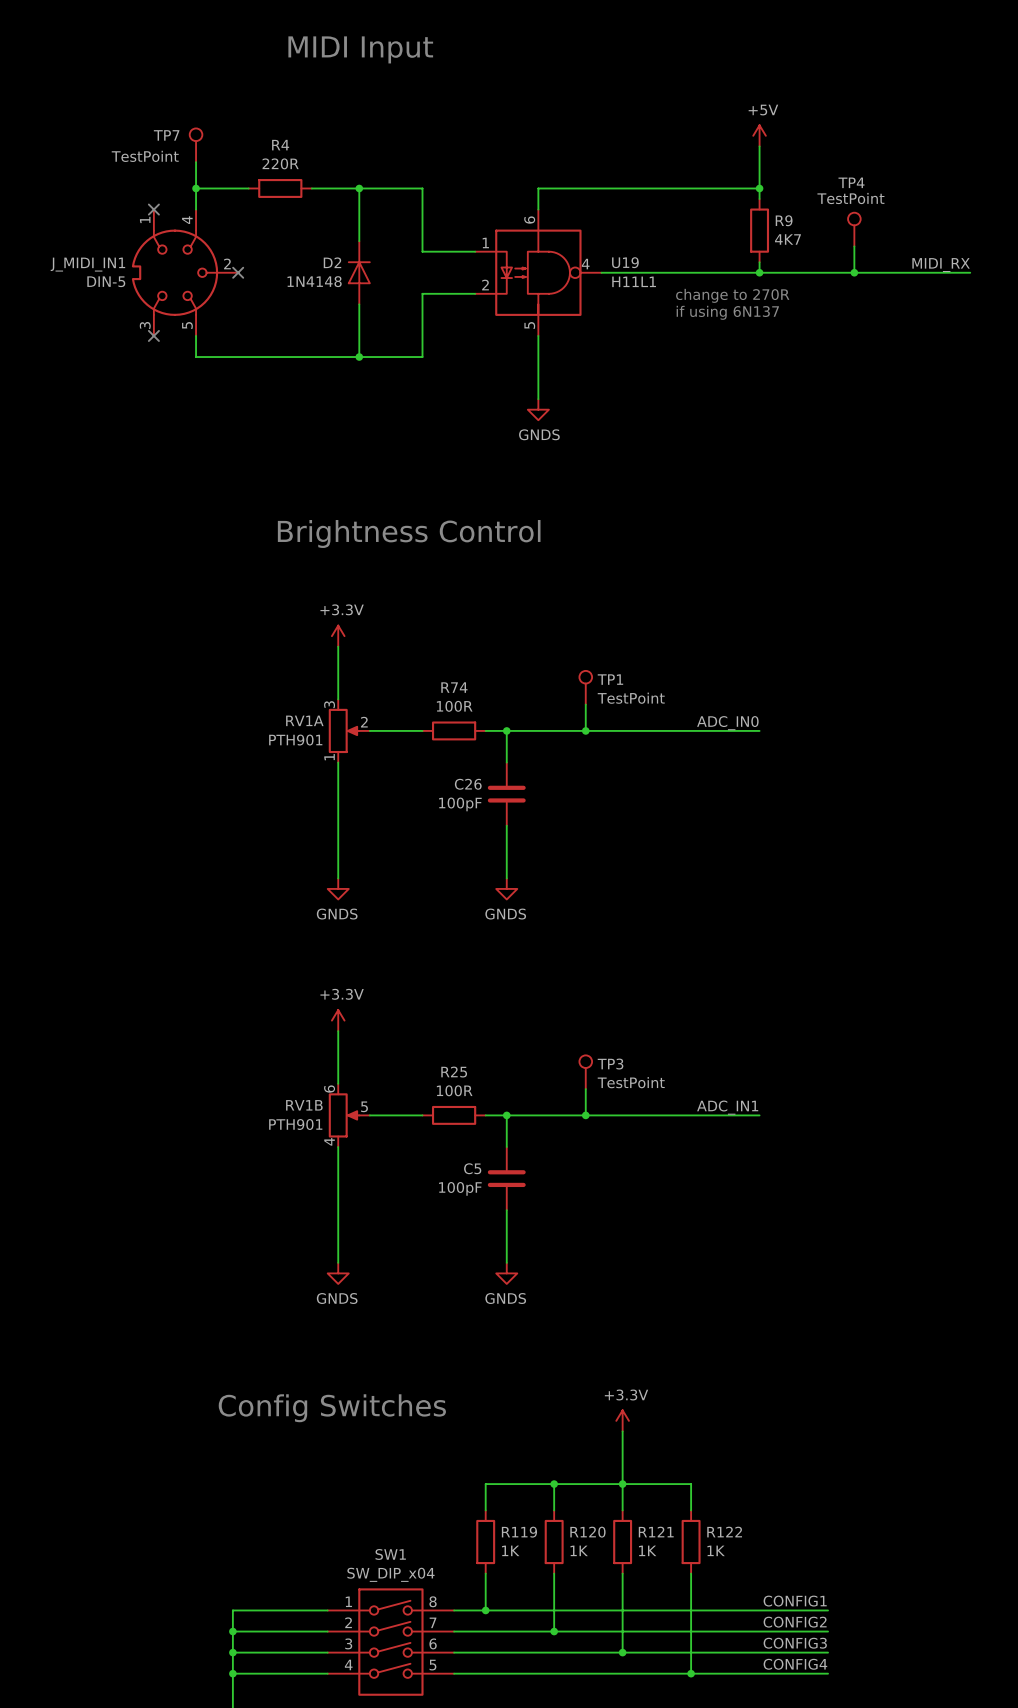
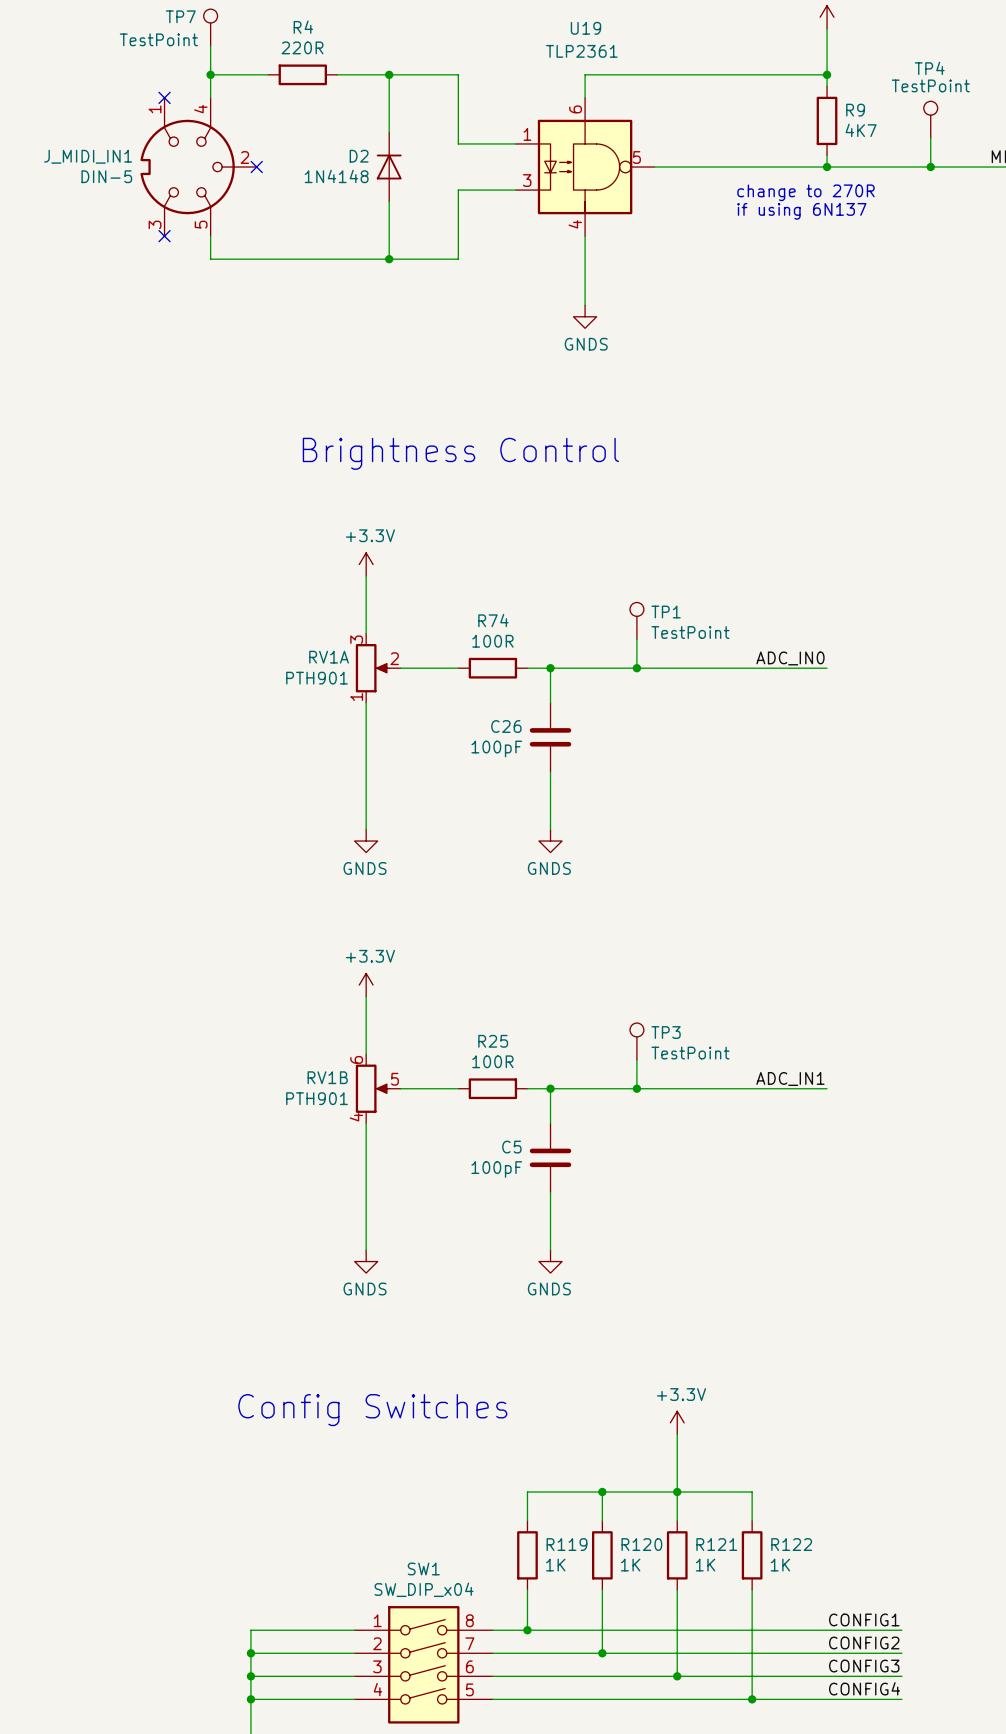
U19 name position: U19 (625, 262) -> U19 (585, 28)
U19 pin number: 4 (585, 264) -> 5 (636, 157)
U19 value: H11L1 (634, 281) -> TLP2361 (581, 51)
U19 pin number: 2 (485, 285) -> 3 (527, 180)
U19 pin number: 5 (529, 325) -> 4 (575, 224)

